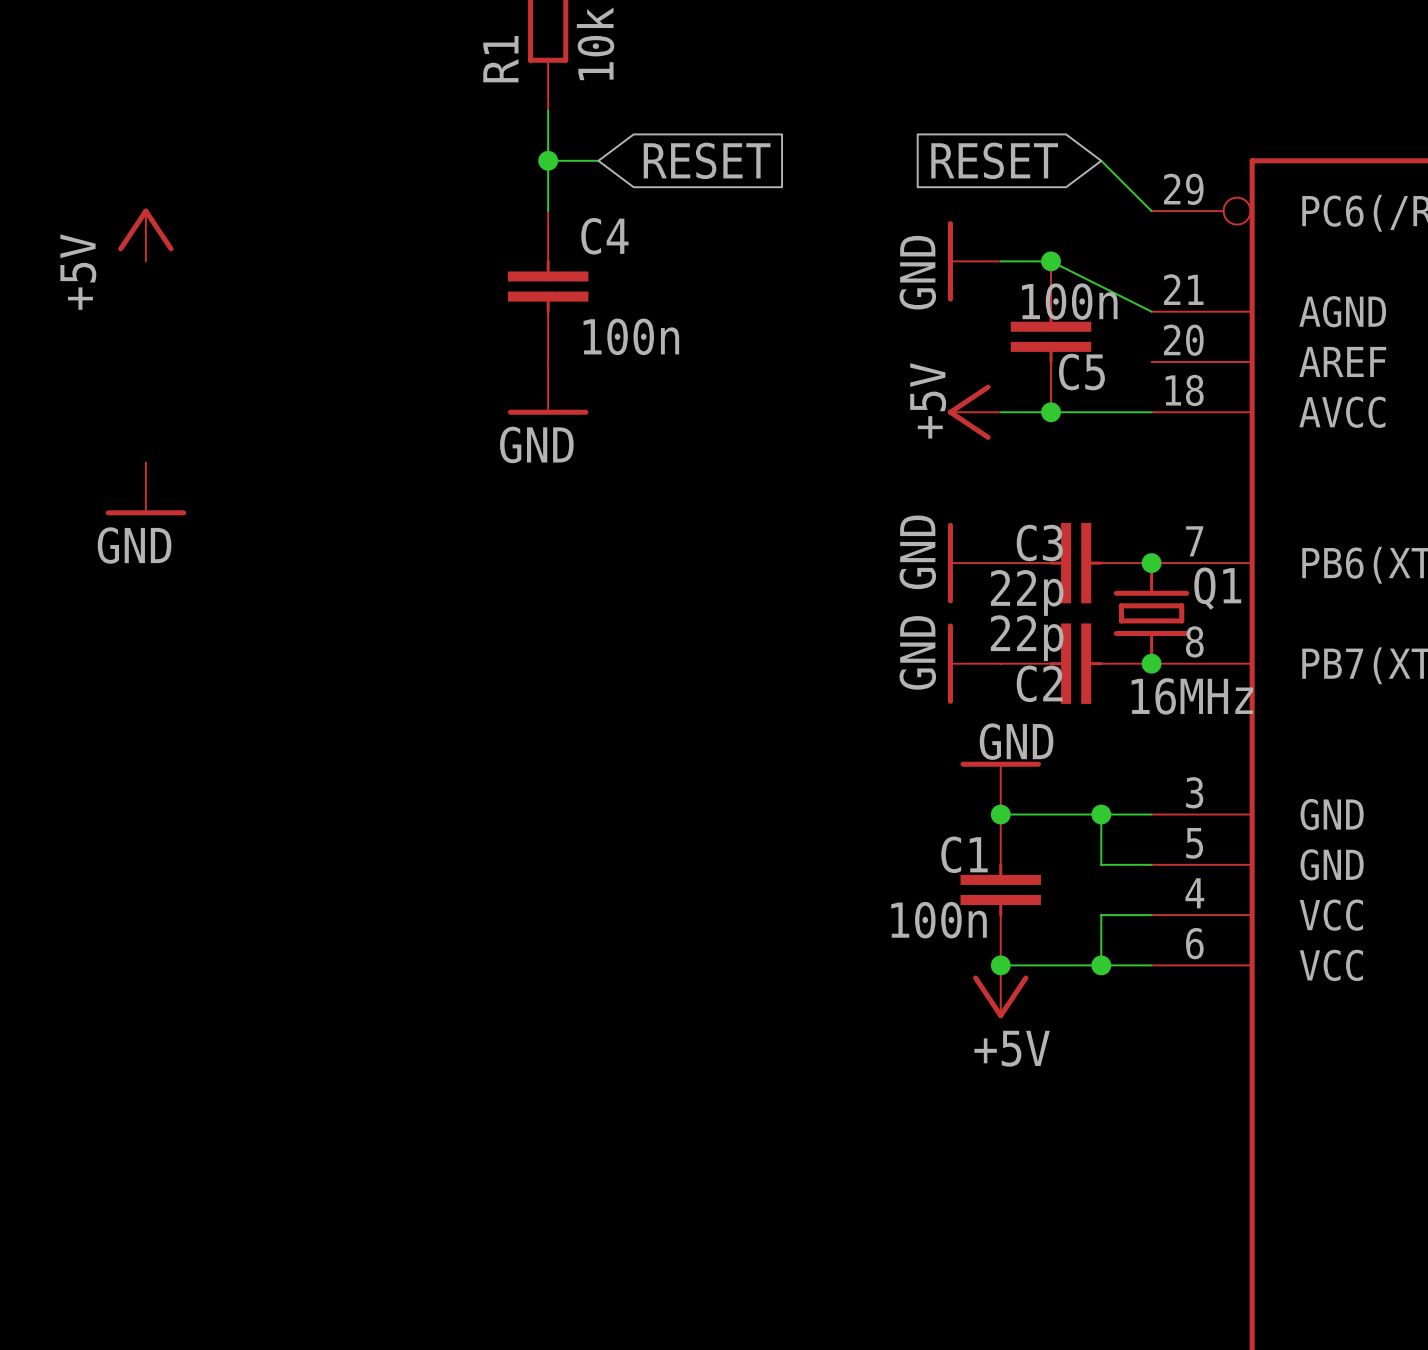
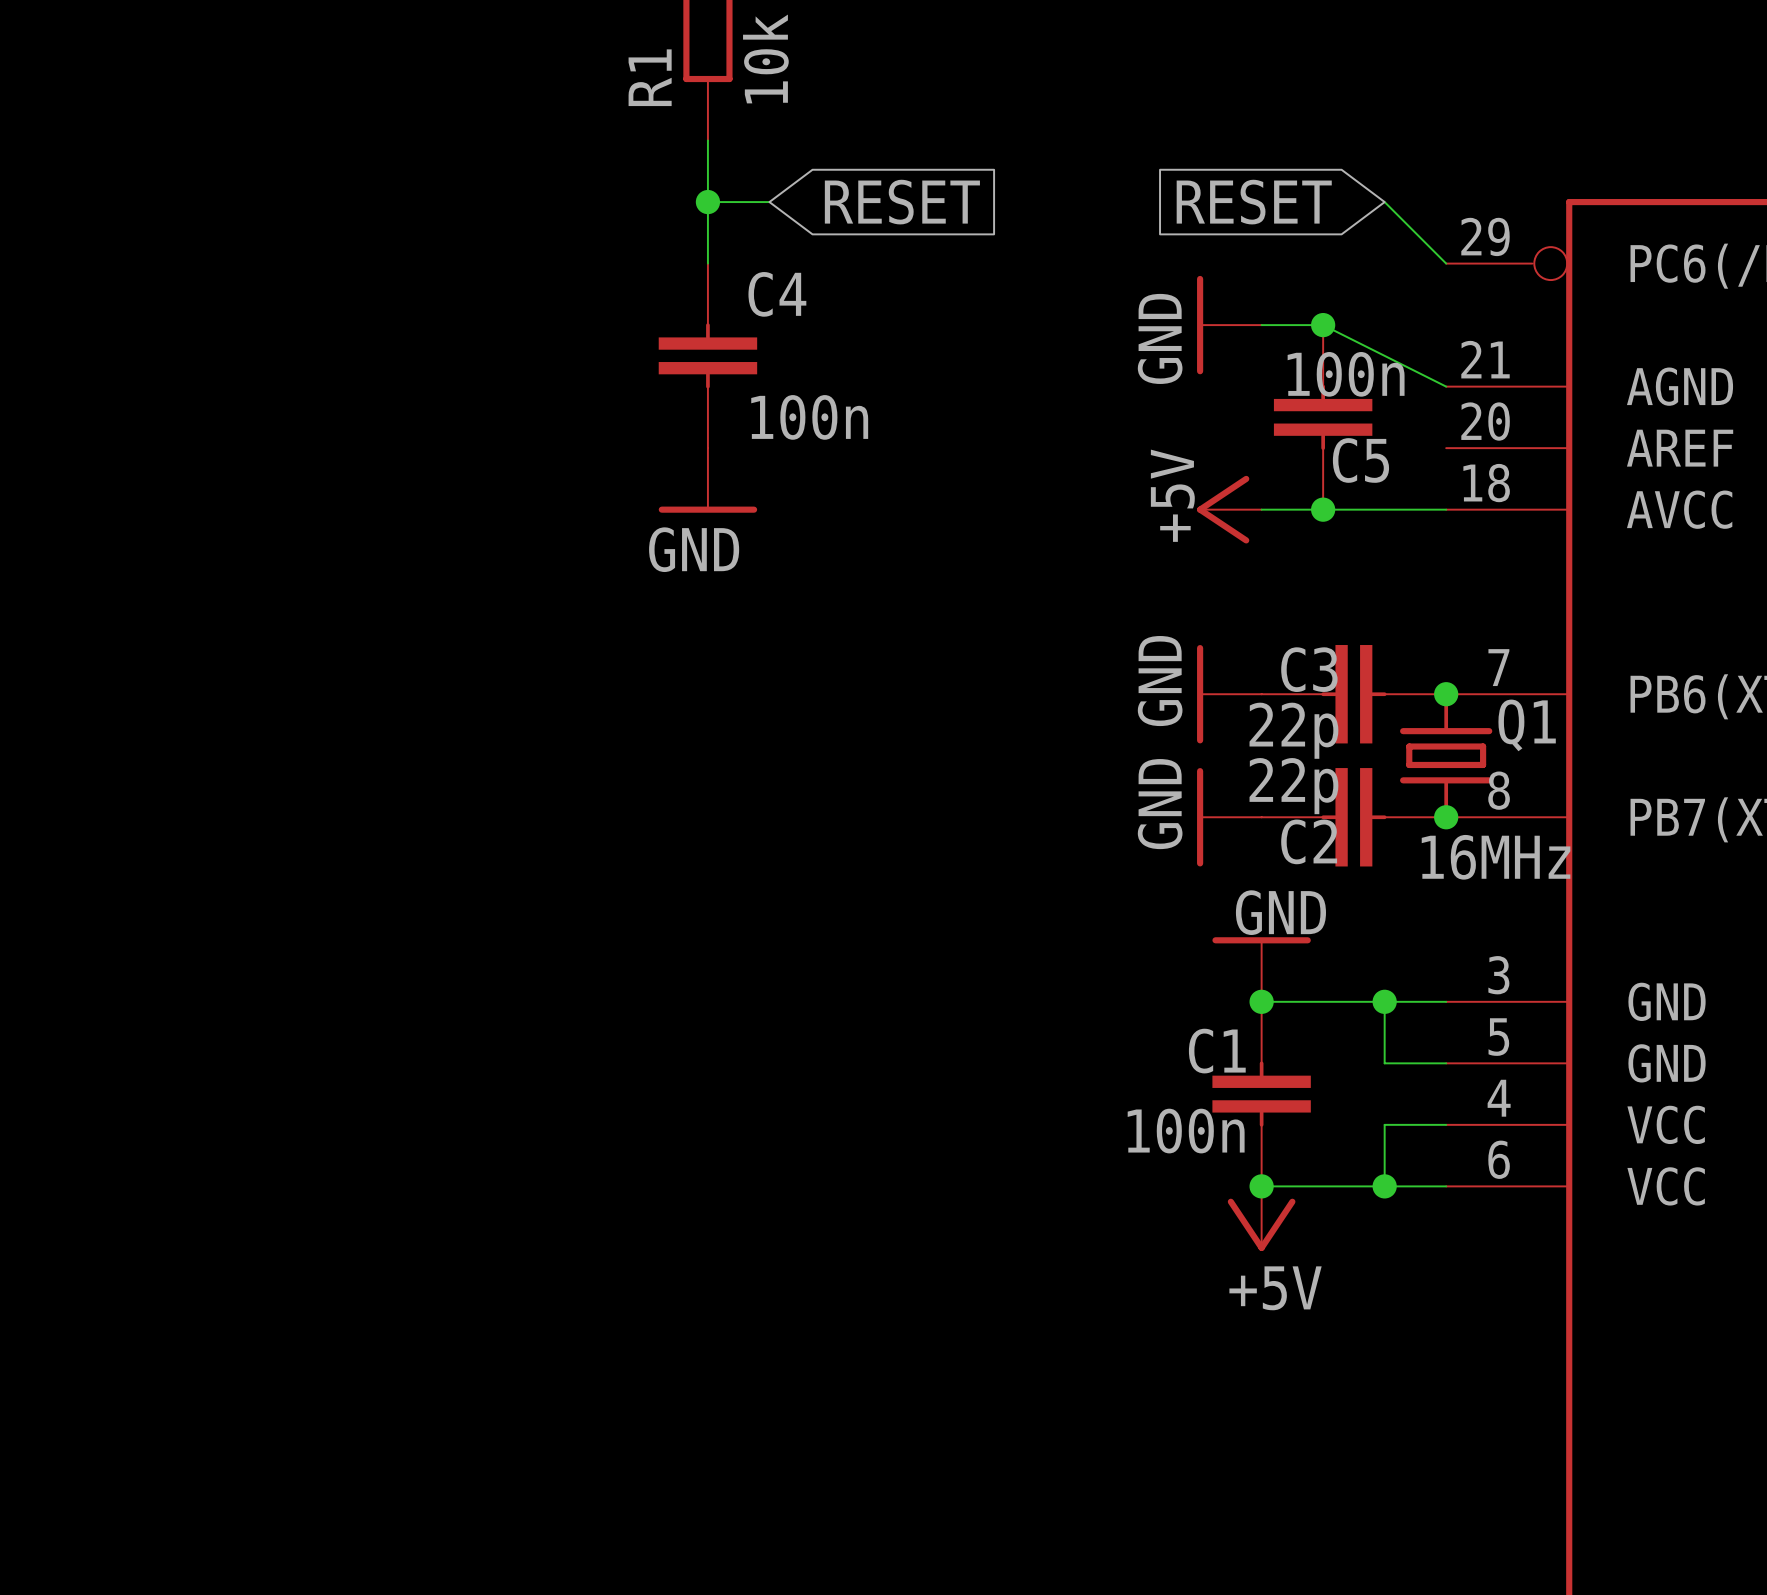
power symbol: +5V (145, 234) -> none
power symbol: GND (145, 488) -> none

